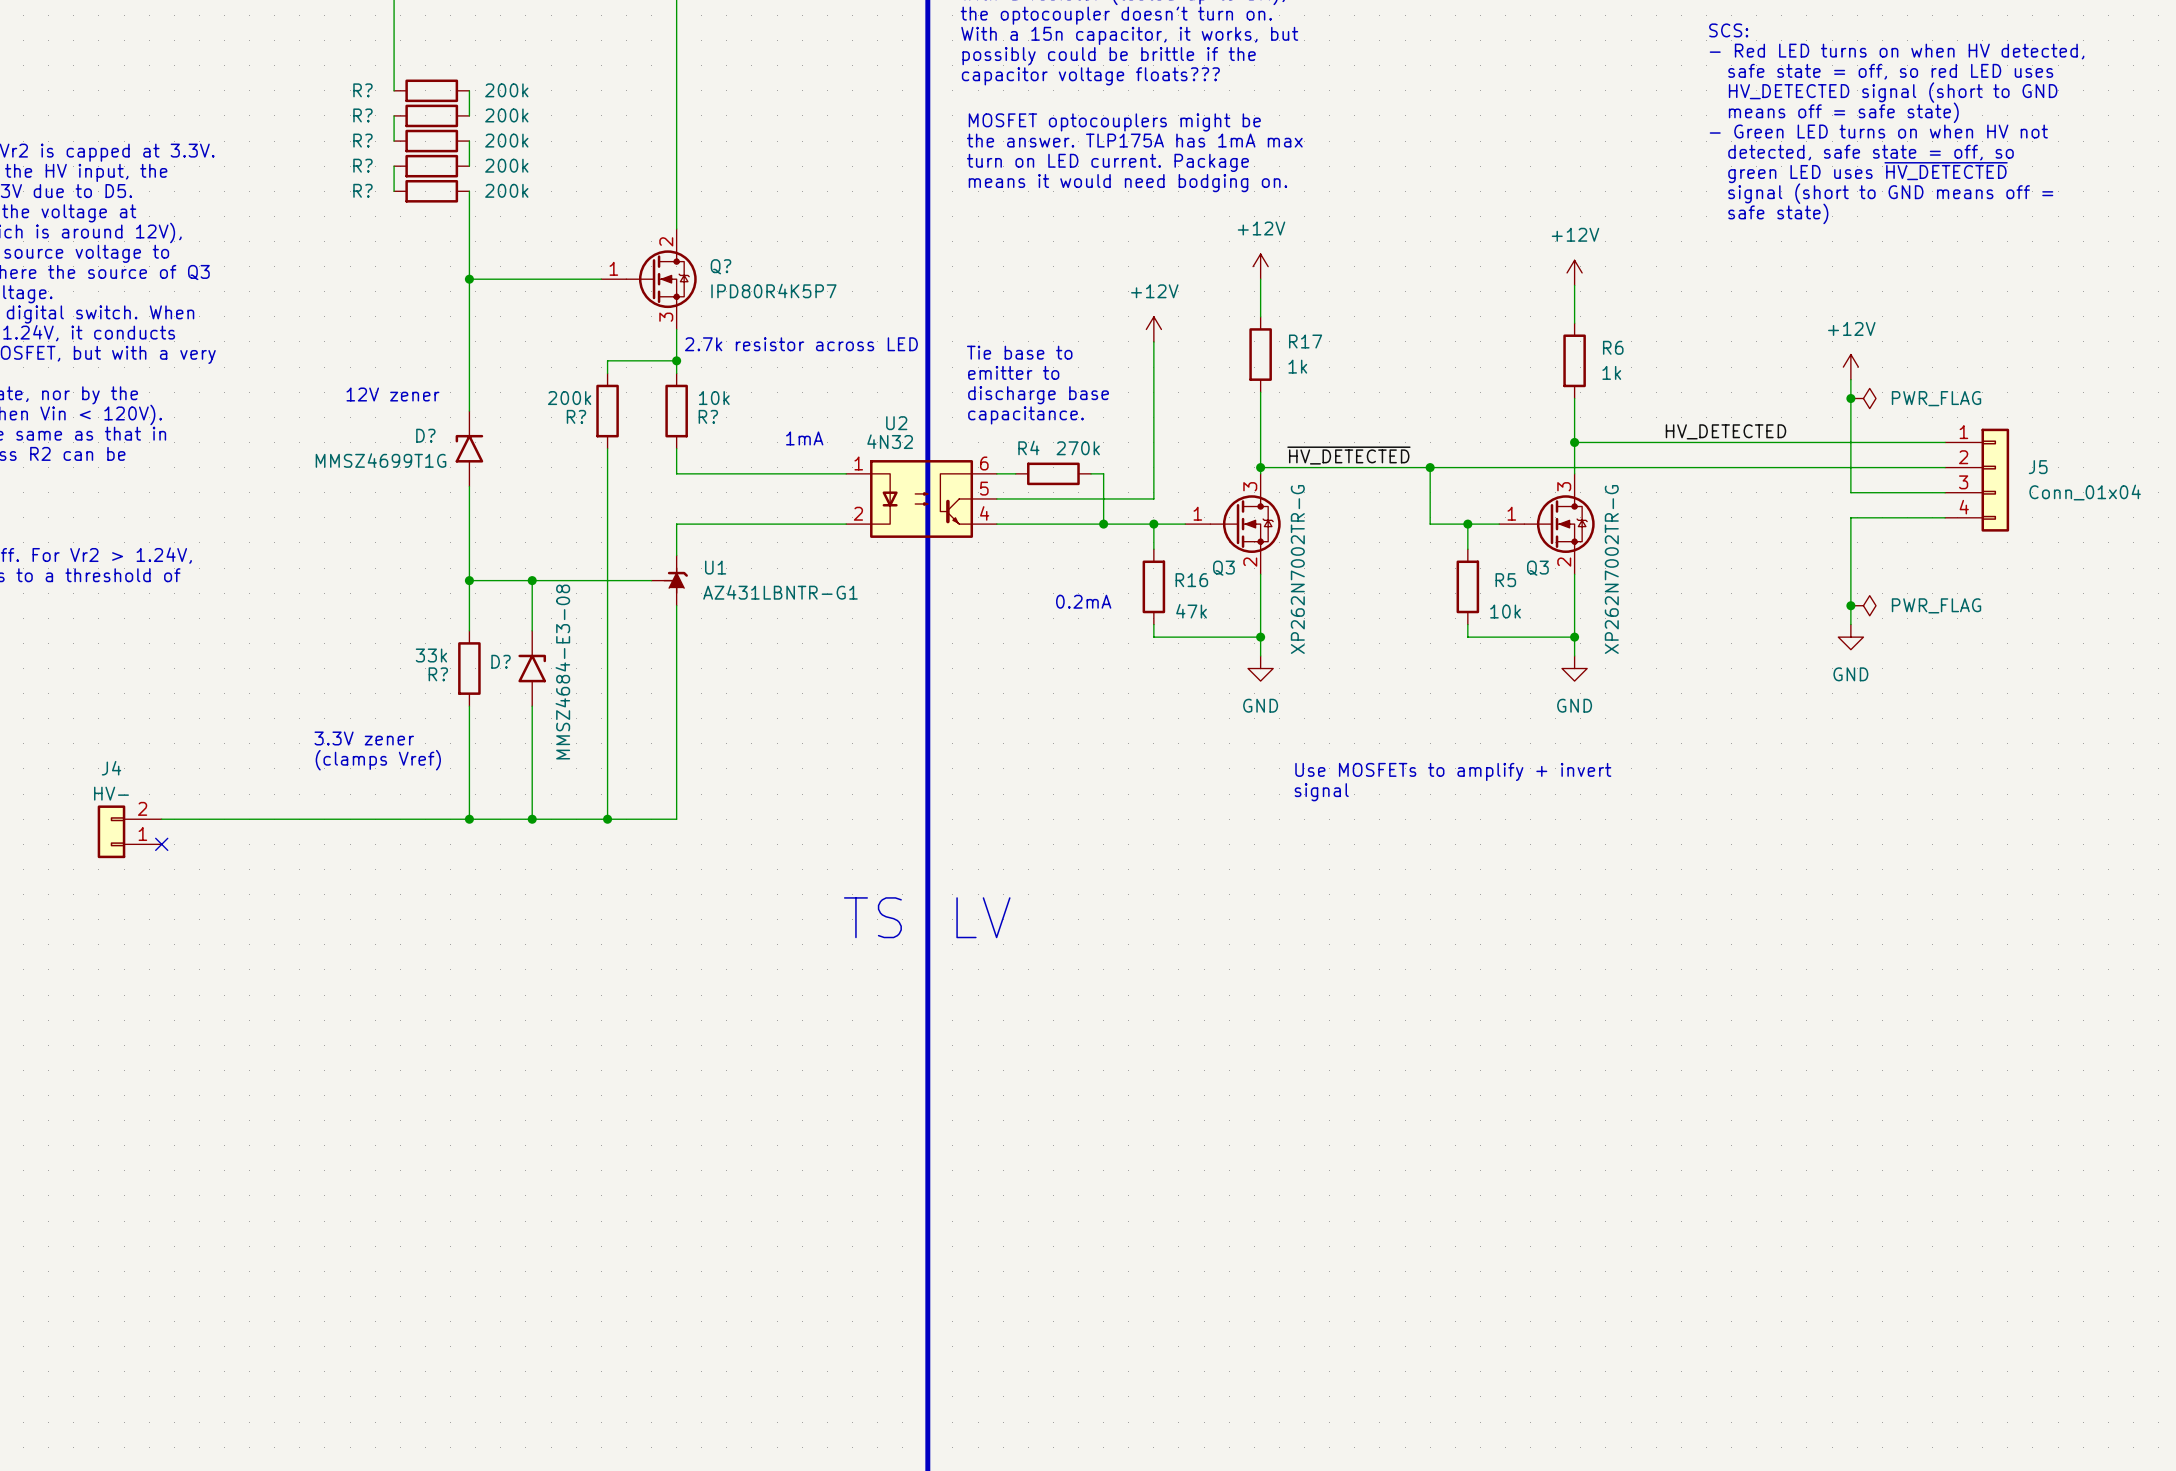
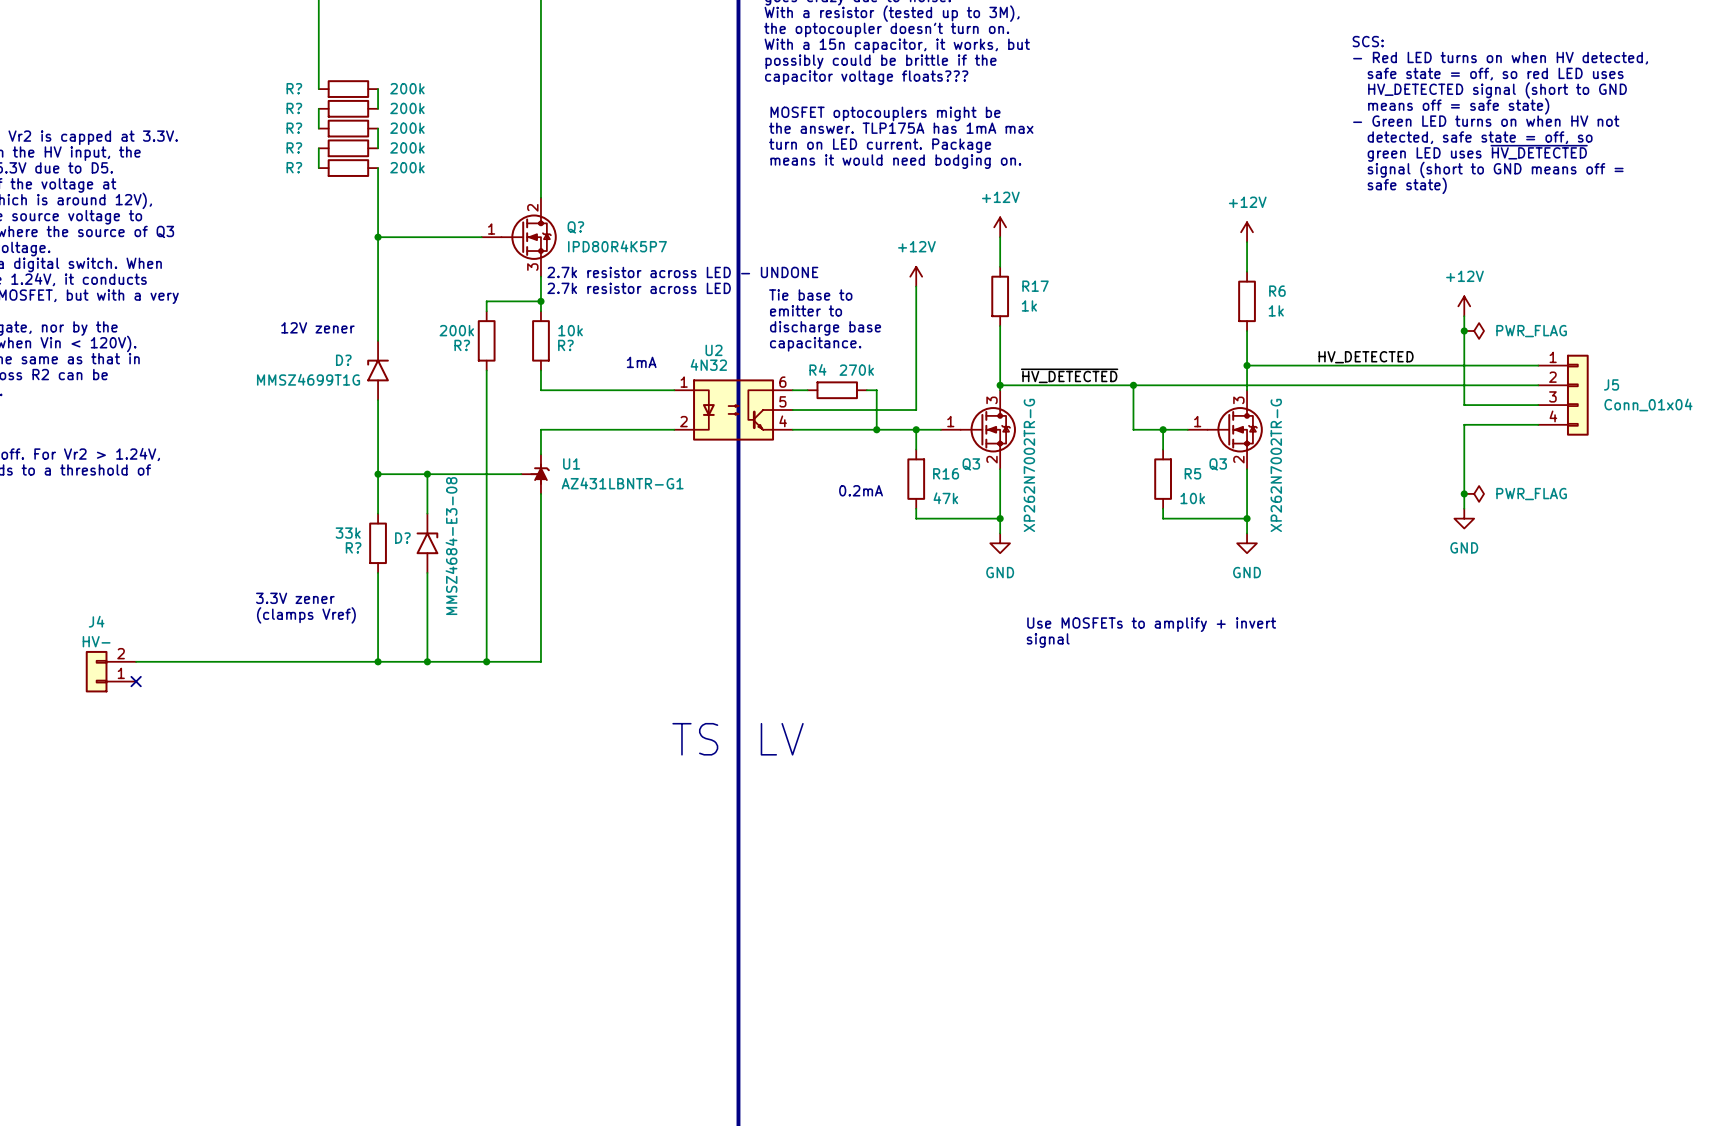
text: none -> 2.7k resistor across LED - UNDONE (682, 272)

